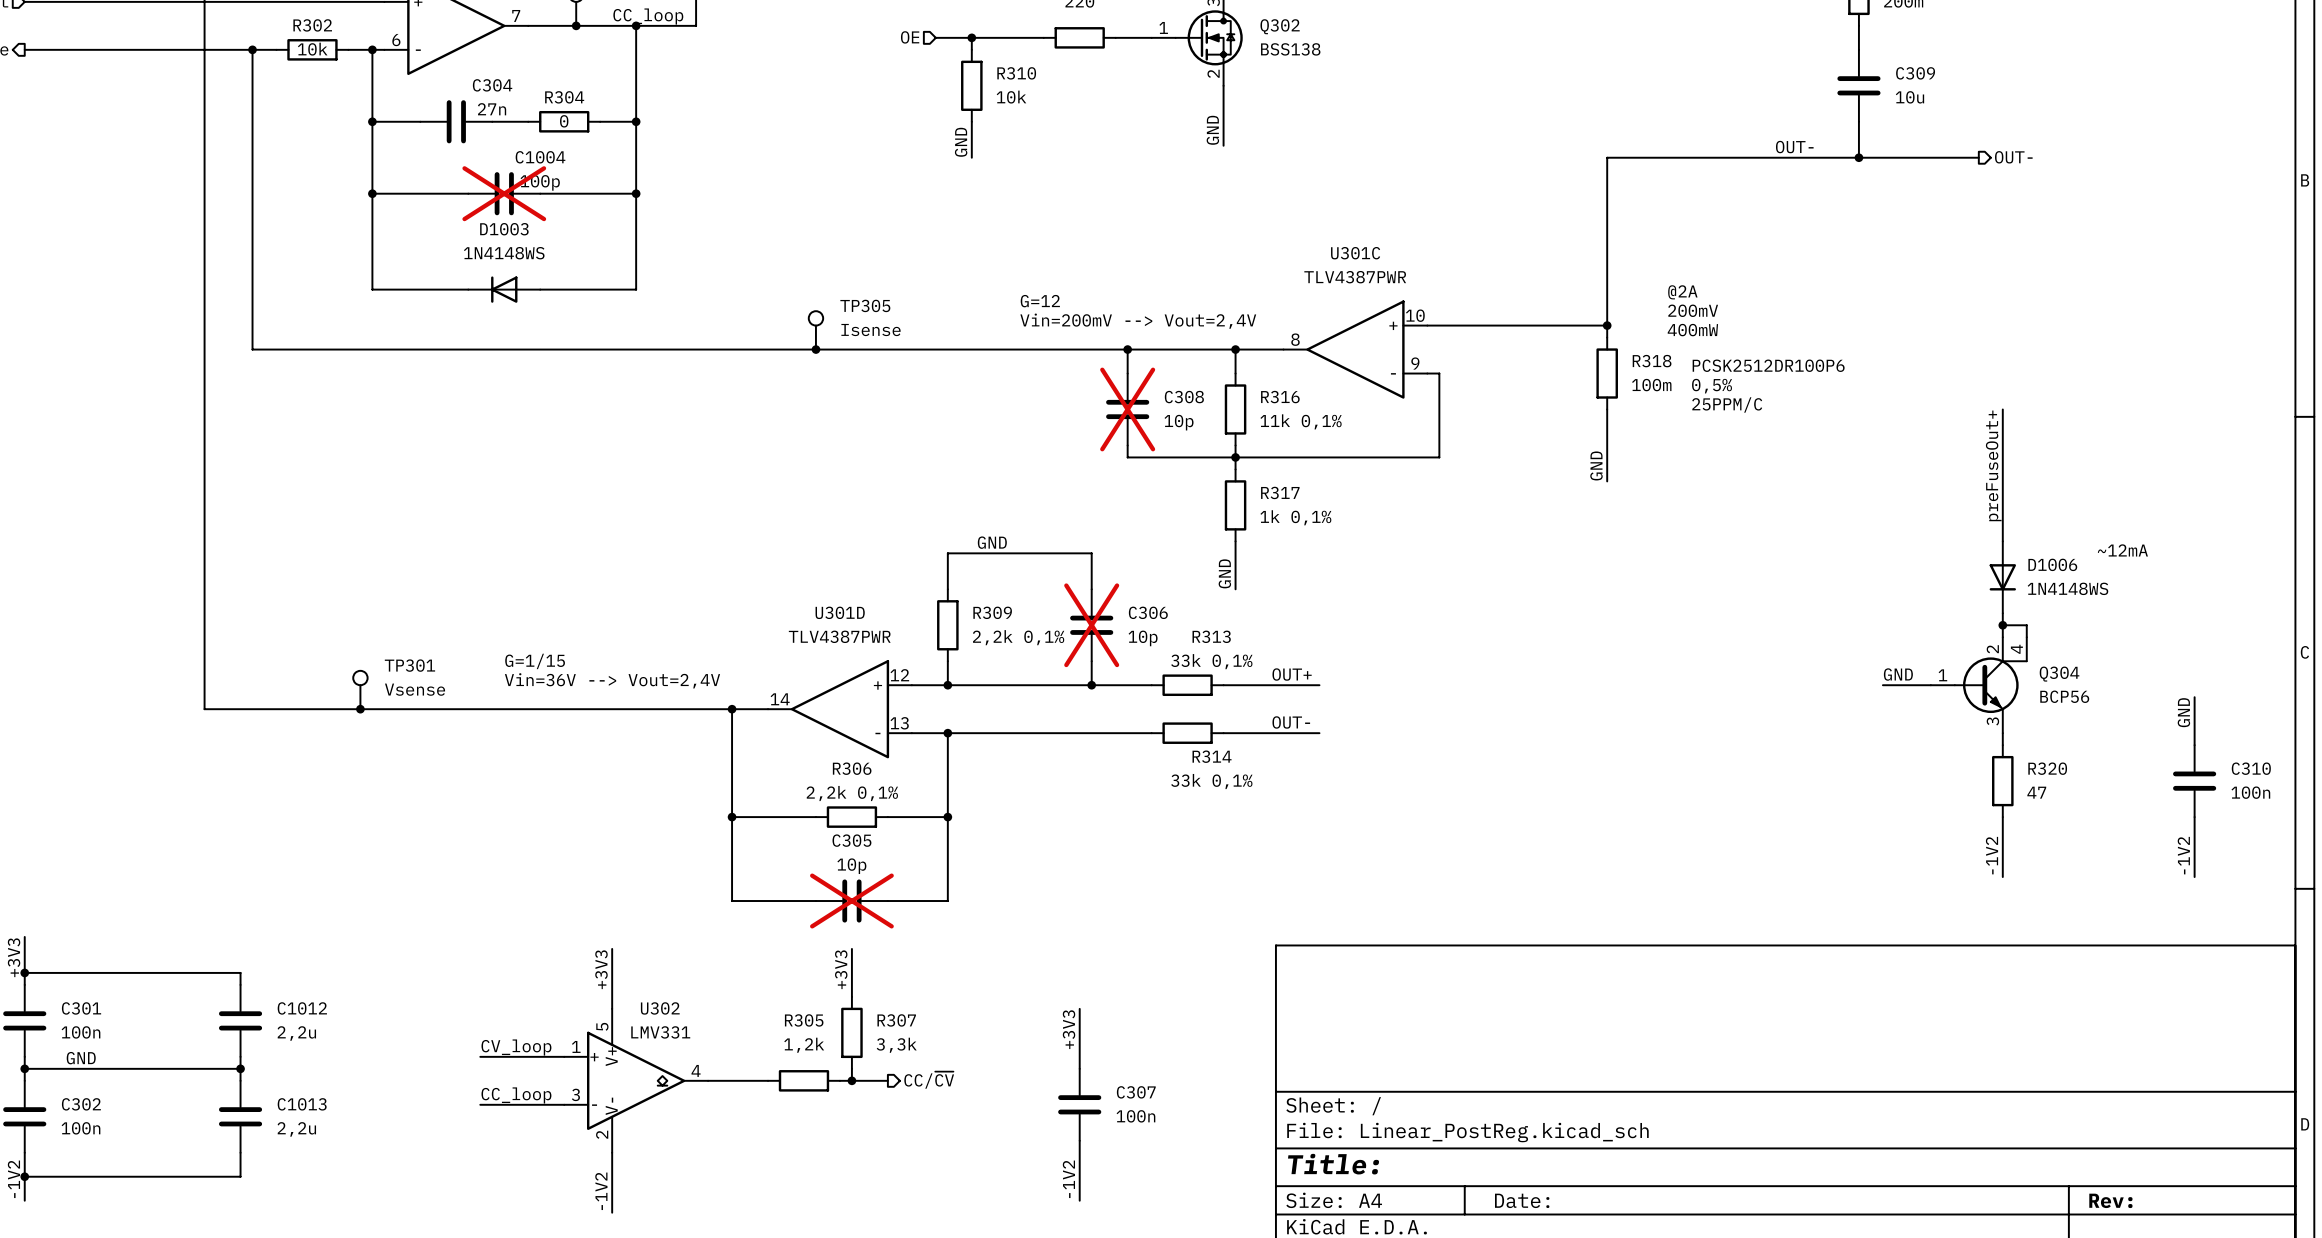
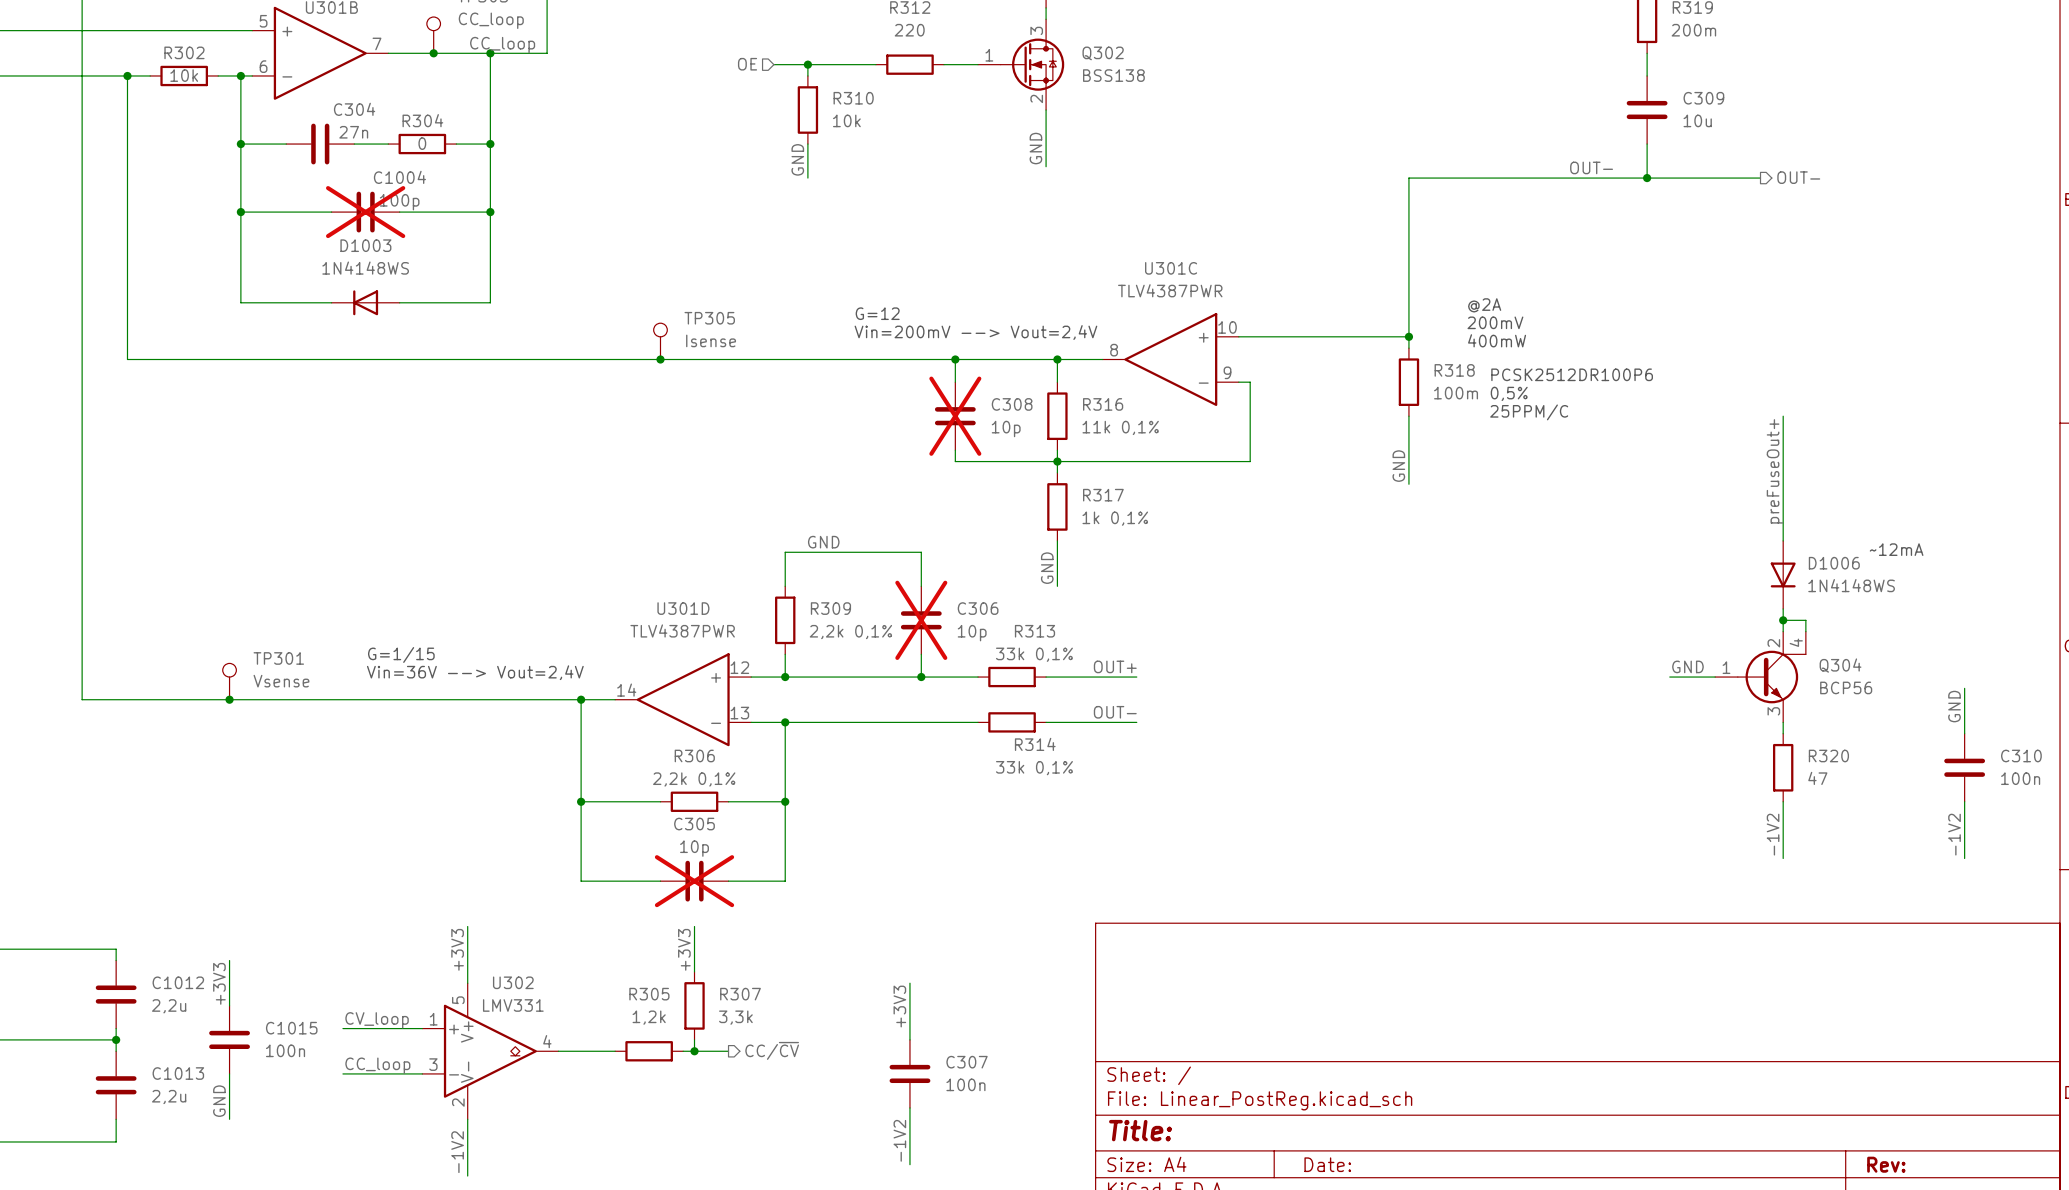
wire: none -> (229, 960) (229, 1005)
label: none -> +3V3 (219, 983)
C1015: none -> 100n (229, 1039)
wire: none -> (229, 1073) (229, 1119)
label: none -> GND (219, 1101)

